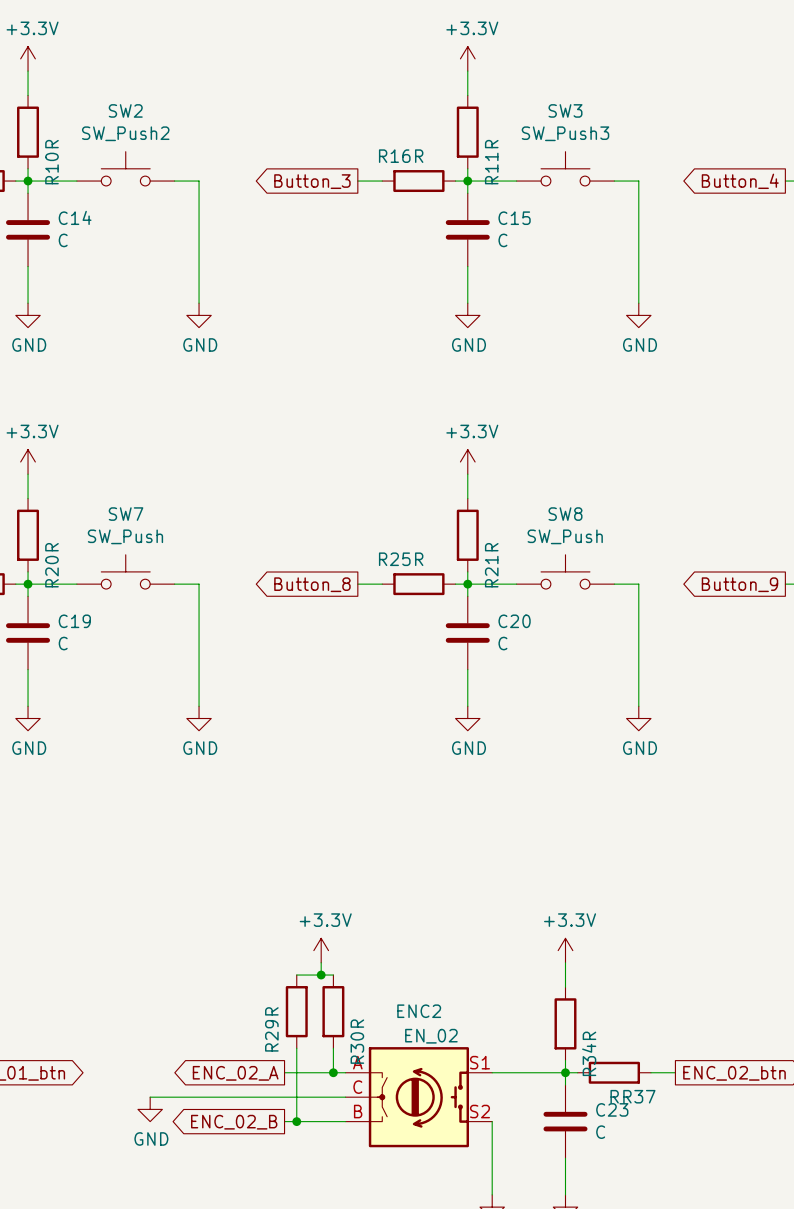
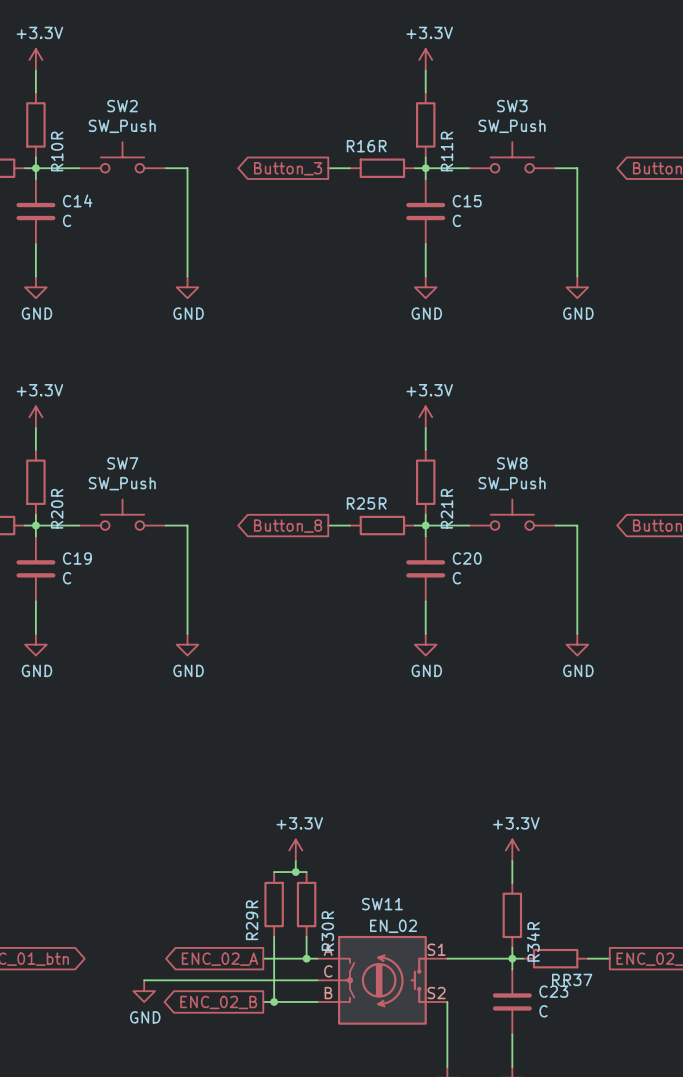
SW2 value: SW_Push2 (125, 133) -> SW_Push (122, 126)
SW3 value: SW_Push3 (565, 133) -> SW_Push (512, 126)
ENC2 name: ENC2 (419, 1011) -> SW11 (382, 904)

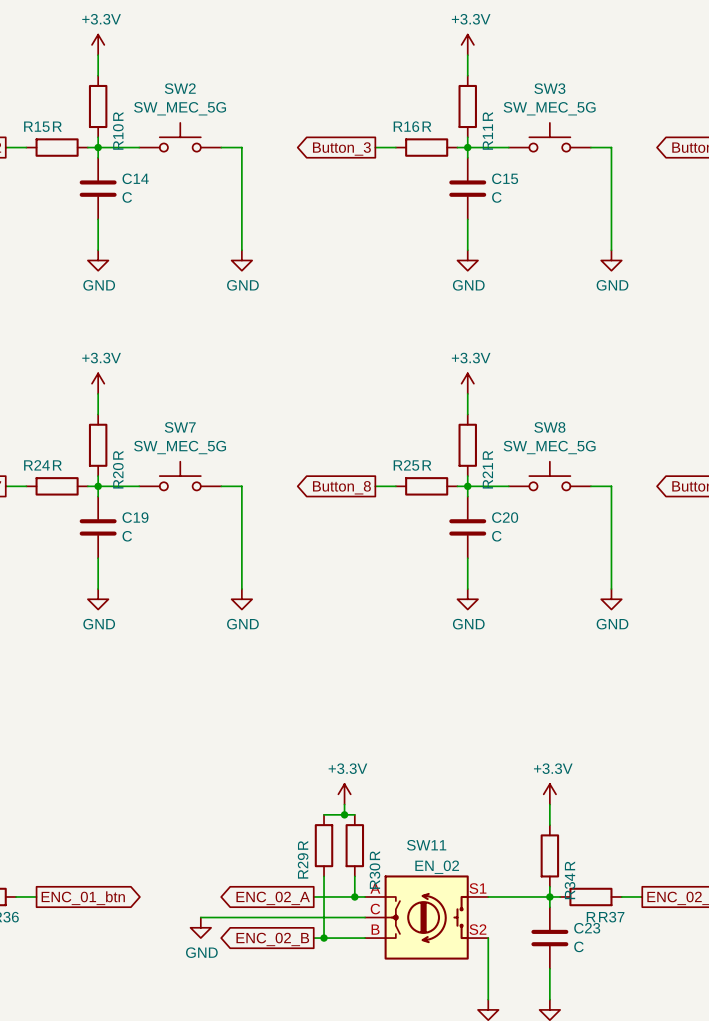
SW2 value: SW_Push (122, 126) -> SW_MEC_5G (180, 108)
SW3 value: SW_Push (512, 126) -> SW_MEC_5G (549, 108)
SW7 value: SW_Push (122, 483) -> SW_MEC_5G (180, 447)
SW8 value: SW_Push (512, 483) -> SW_MEC_5G (549, 447)

